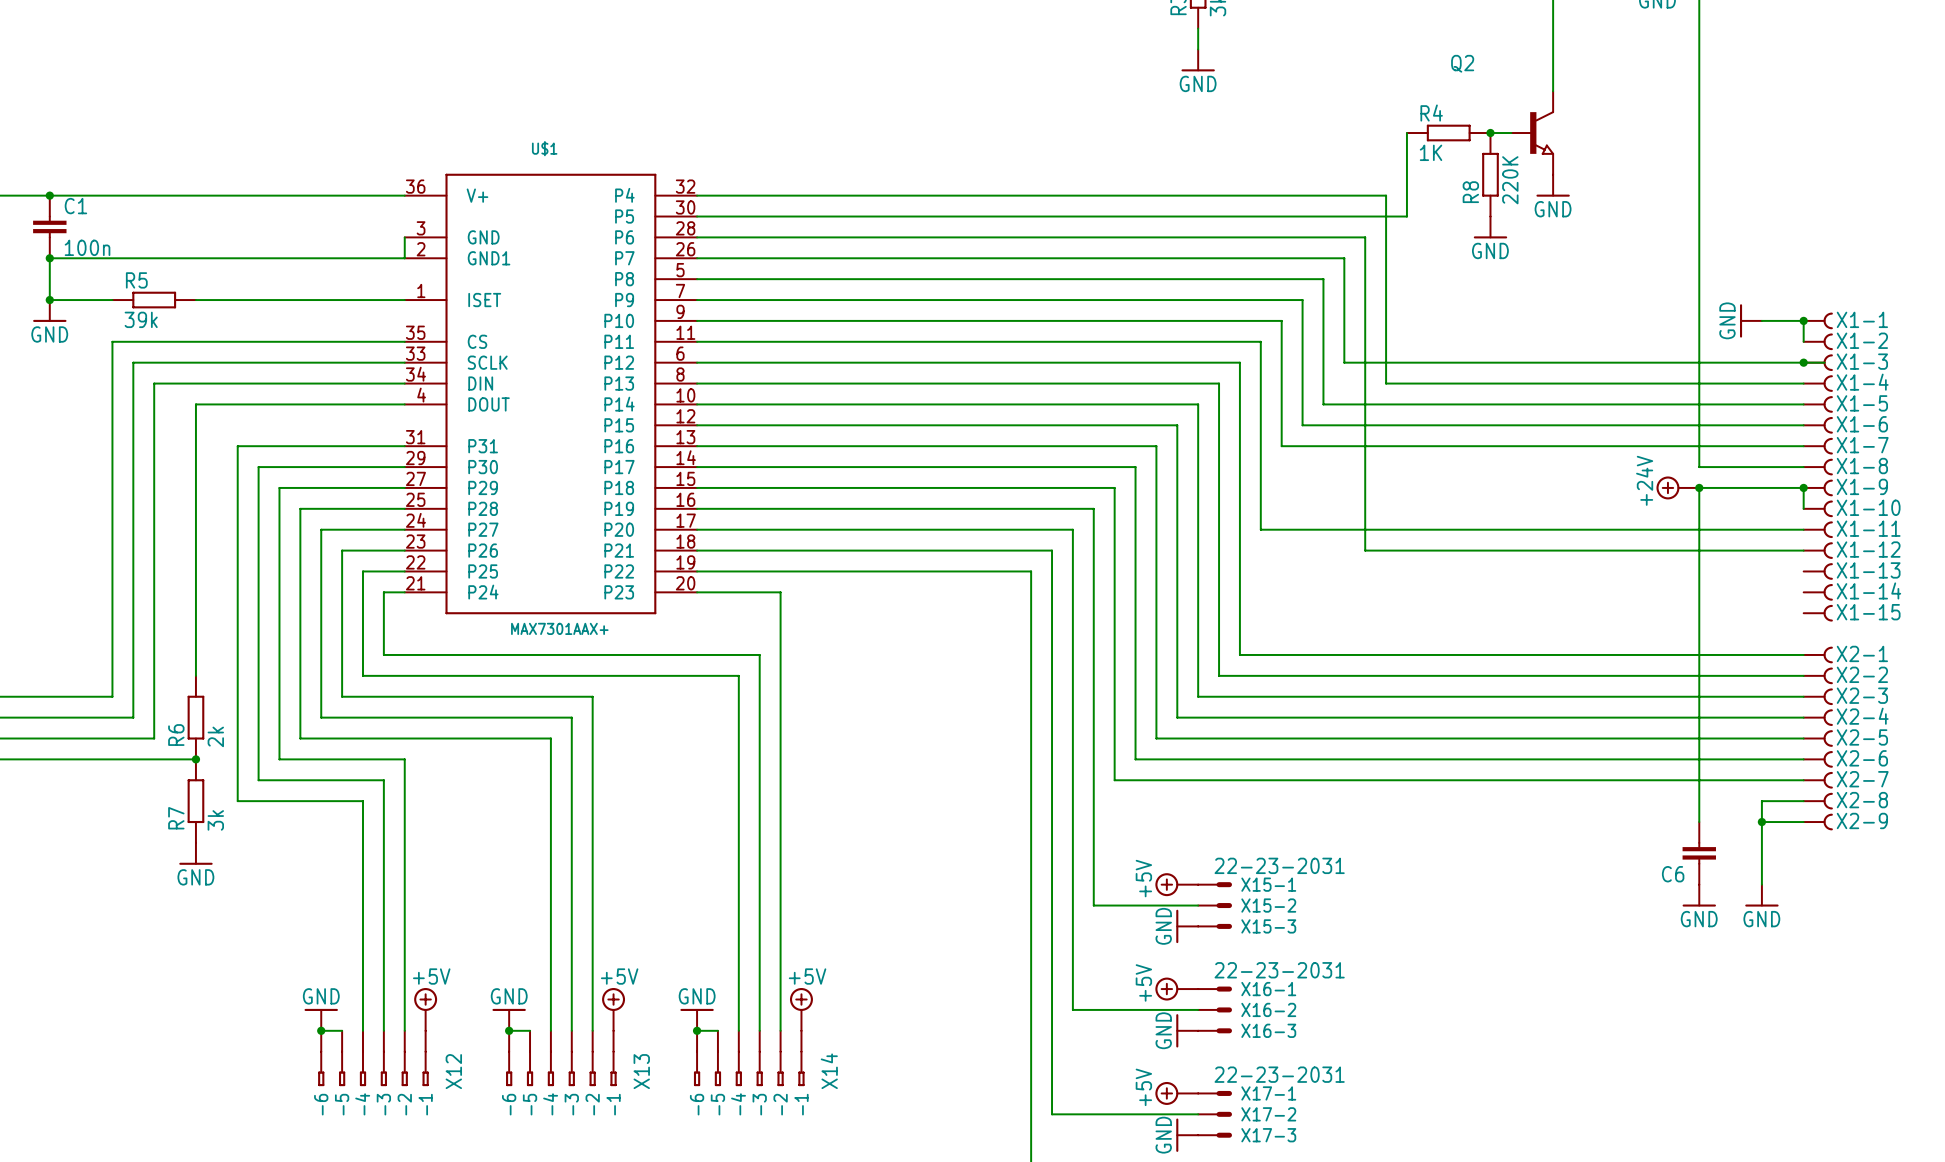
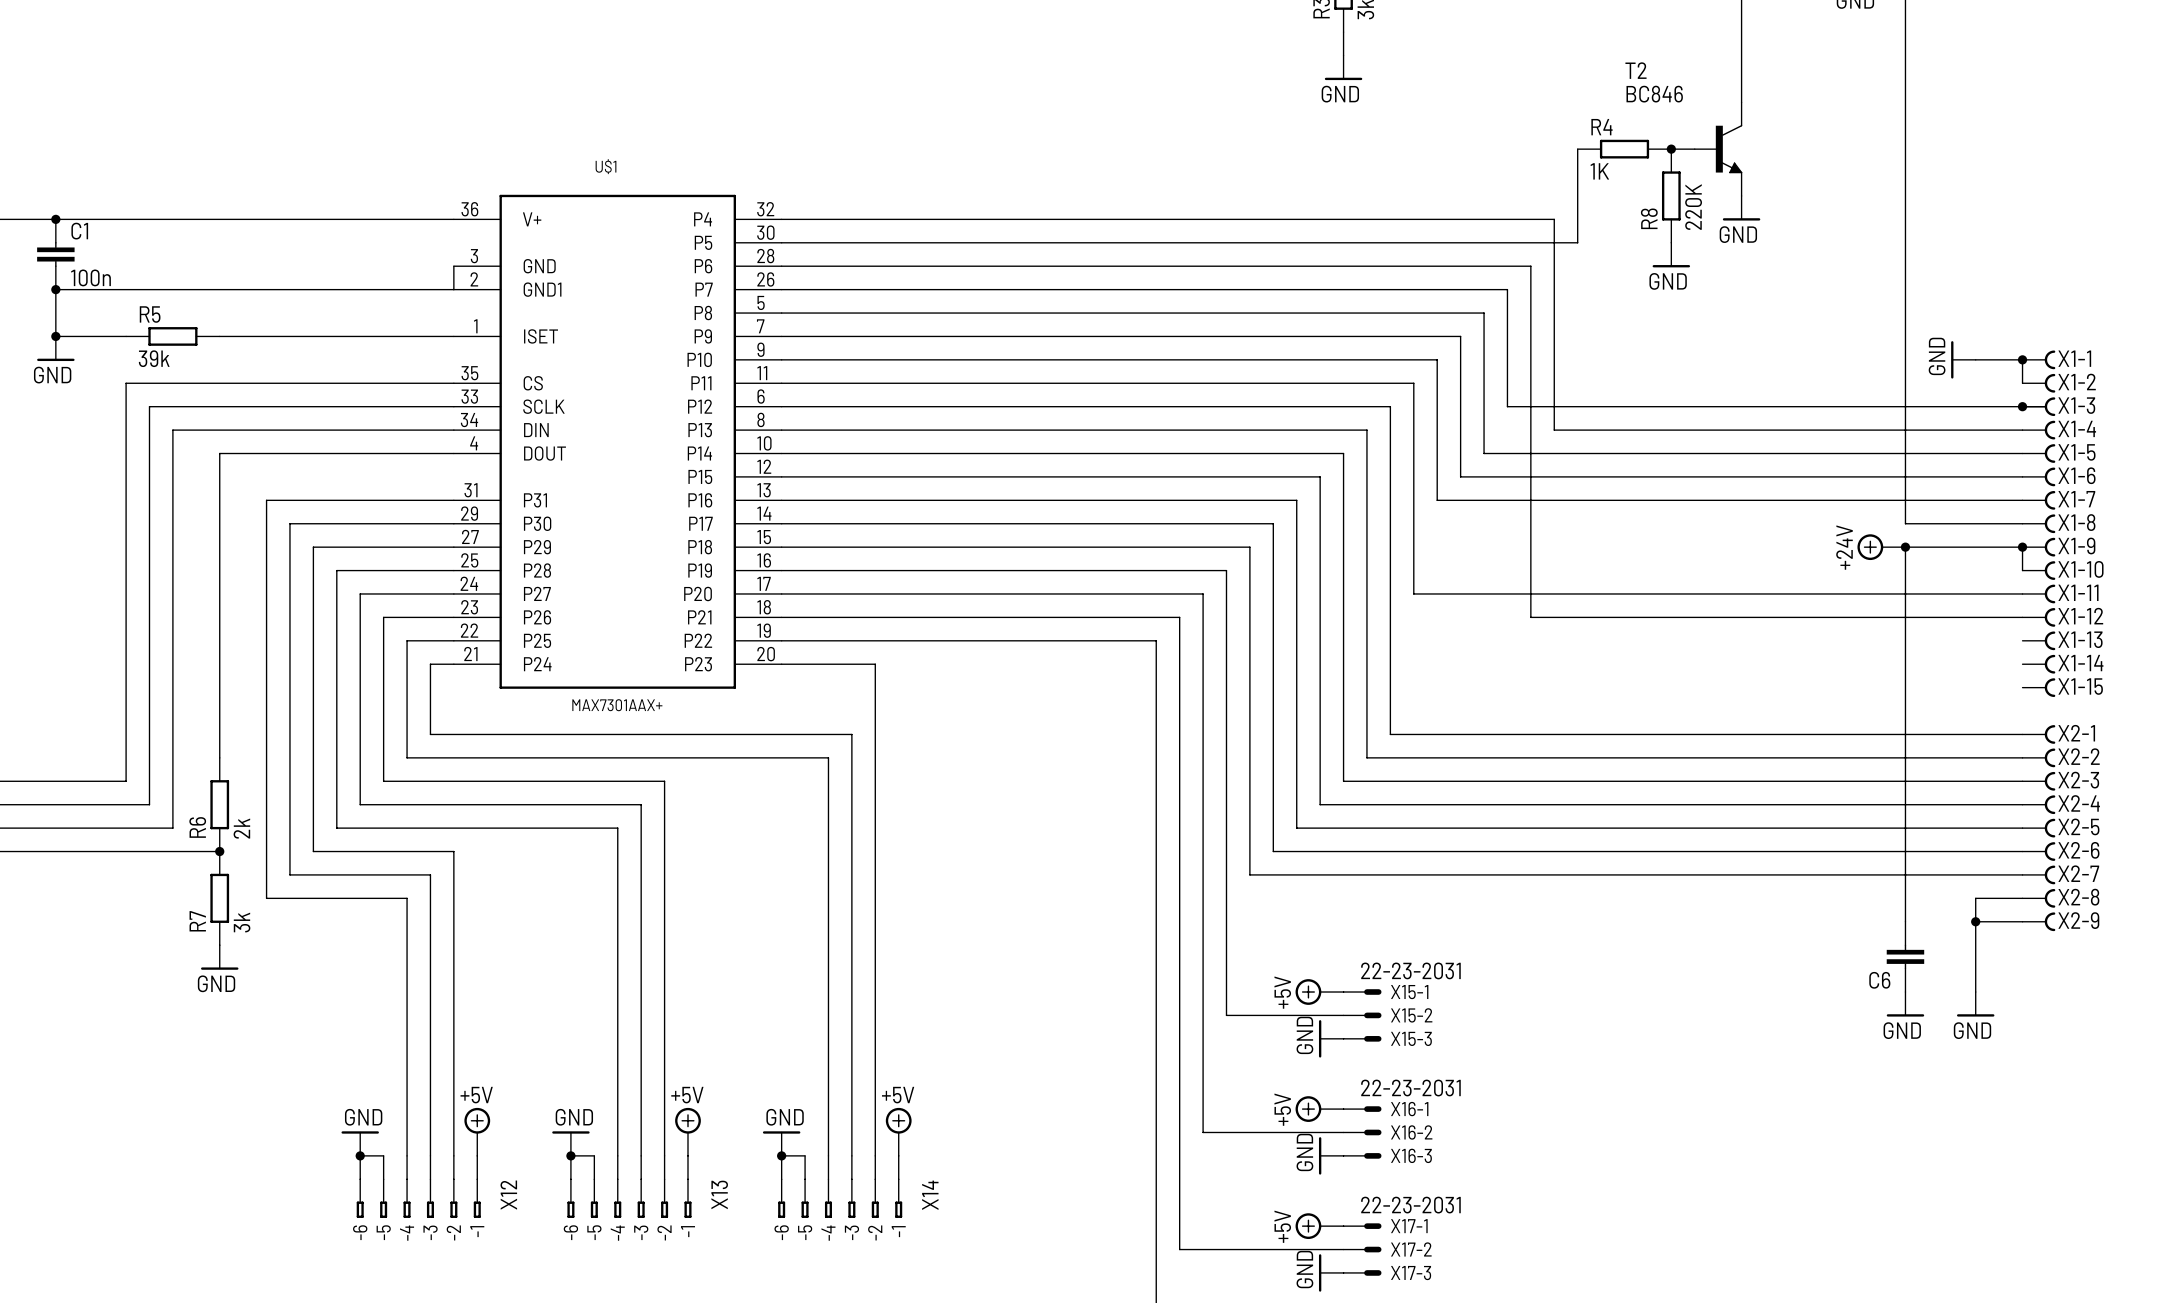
Q2: (1532, 133) -> none
T2: none -> BC846 (1718, 149)

